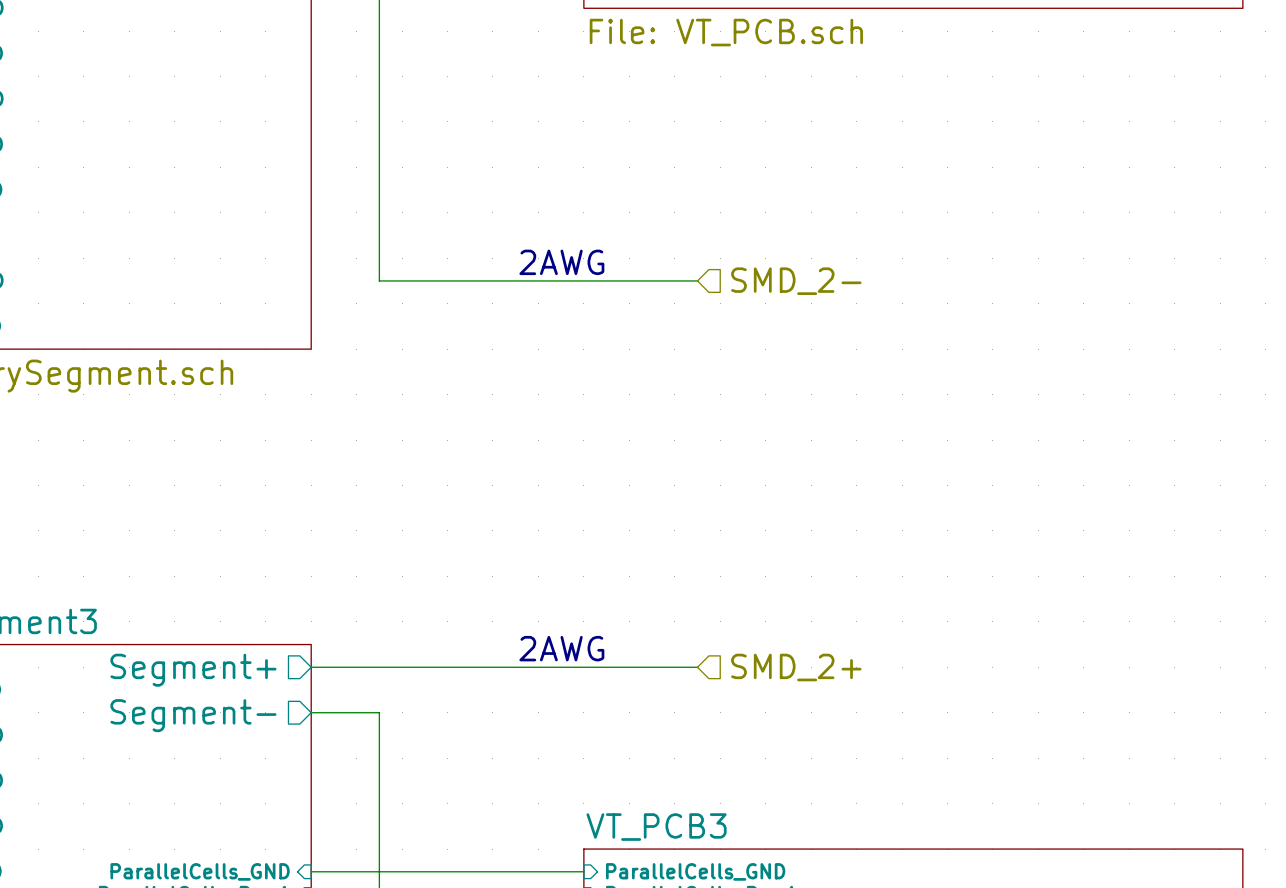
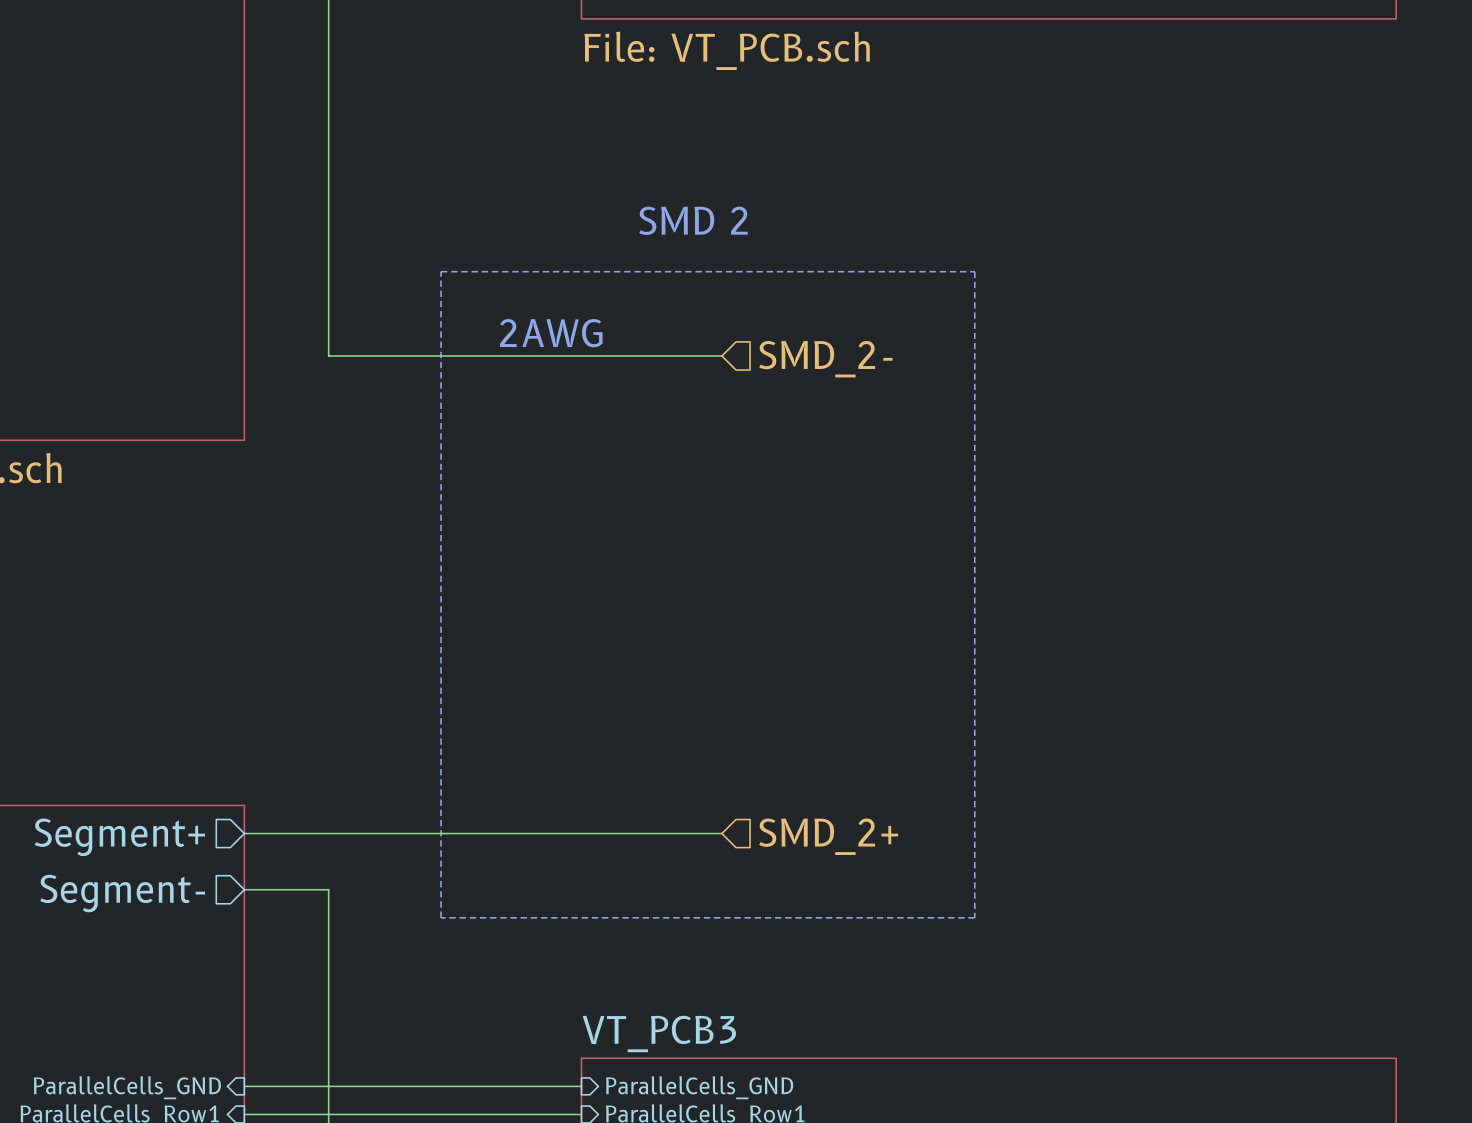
text: none -> SMD 2 (693, 220)
line: none -> (441, 271) (974, 271) (974, 917) (441, 917) (441, 271)
text: 2AWG (561, 648) -> none

